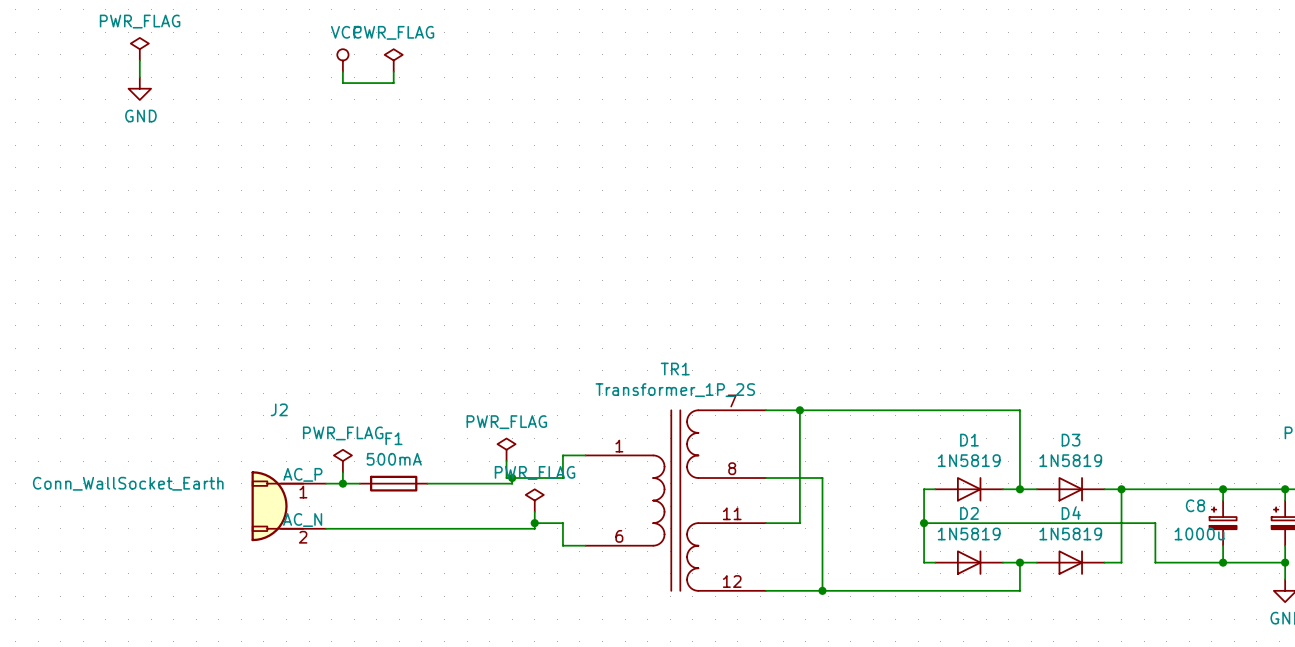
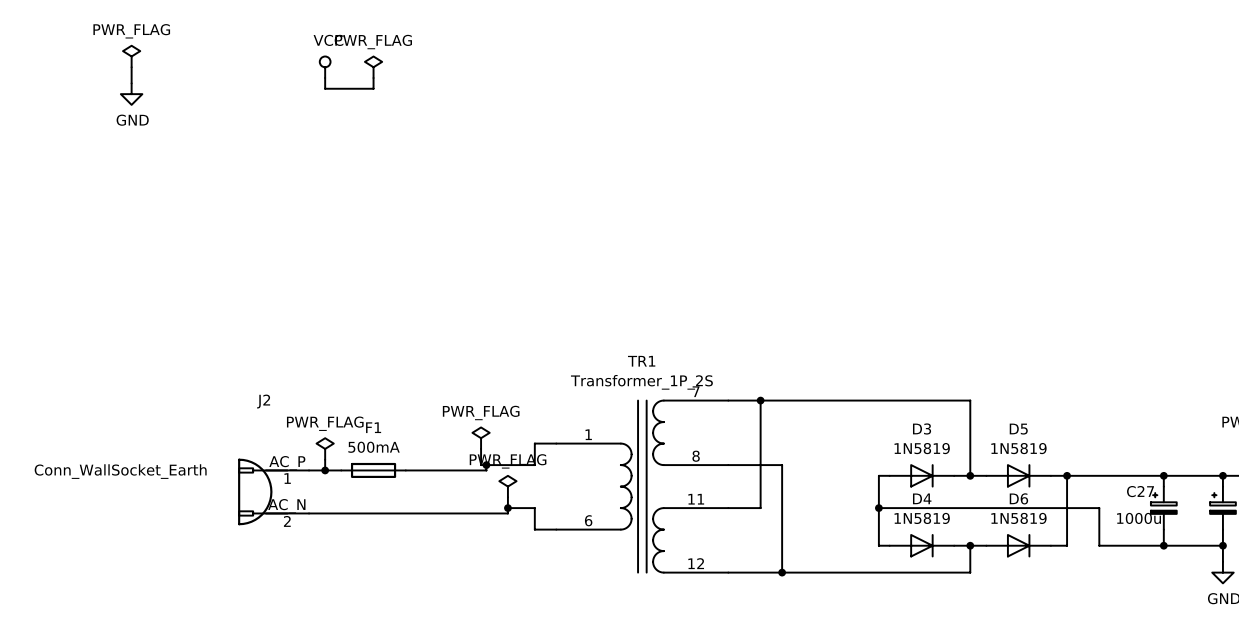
D1 name: D1 (969, 440) -> D3 (922, 428)
D3 name: D3 (1071, 440) -> D5 (1018, 429)
C8 name: C8 (1195, 505) -> C27 (1140, 491)
D2 name: D2 (969, 513) -> D4 (922, 498)
D4 name: D4 (1071, 513) -> D6 (1018, 498)

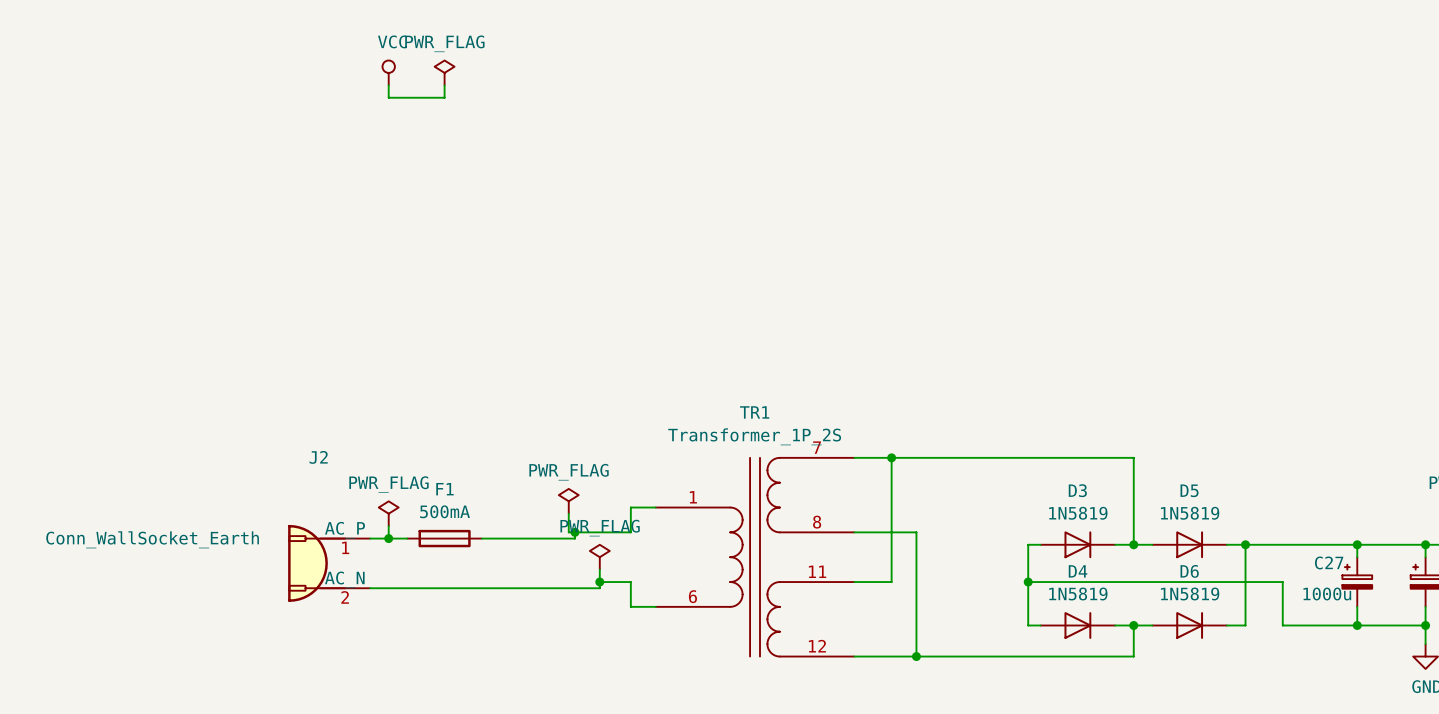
power symbol: PWR_FLAG (131, 56) -> none
wire: (131, 67) (131, 83) -> none
power symbol: GND (131, 94) -> none

